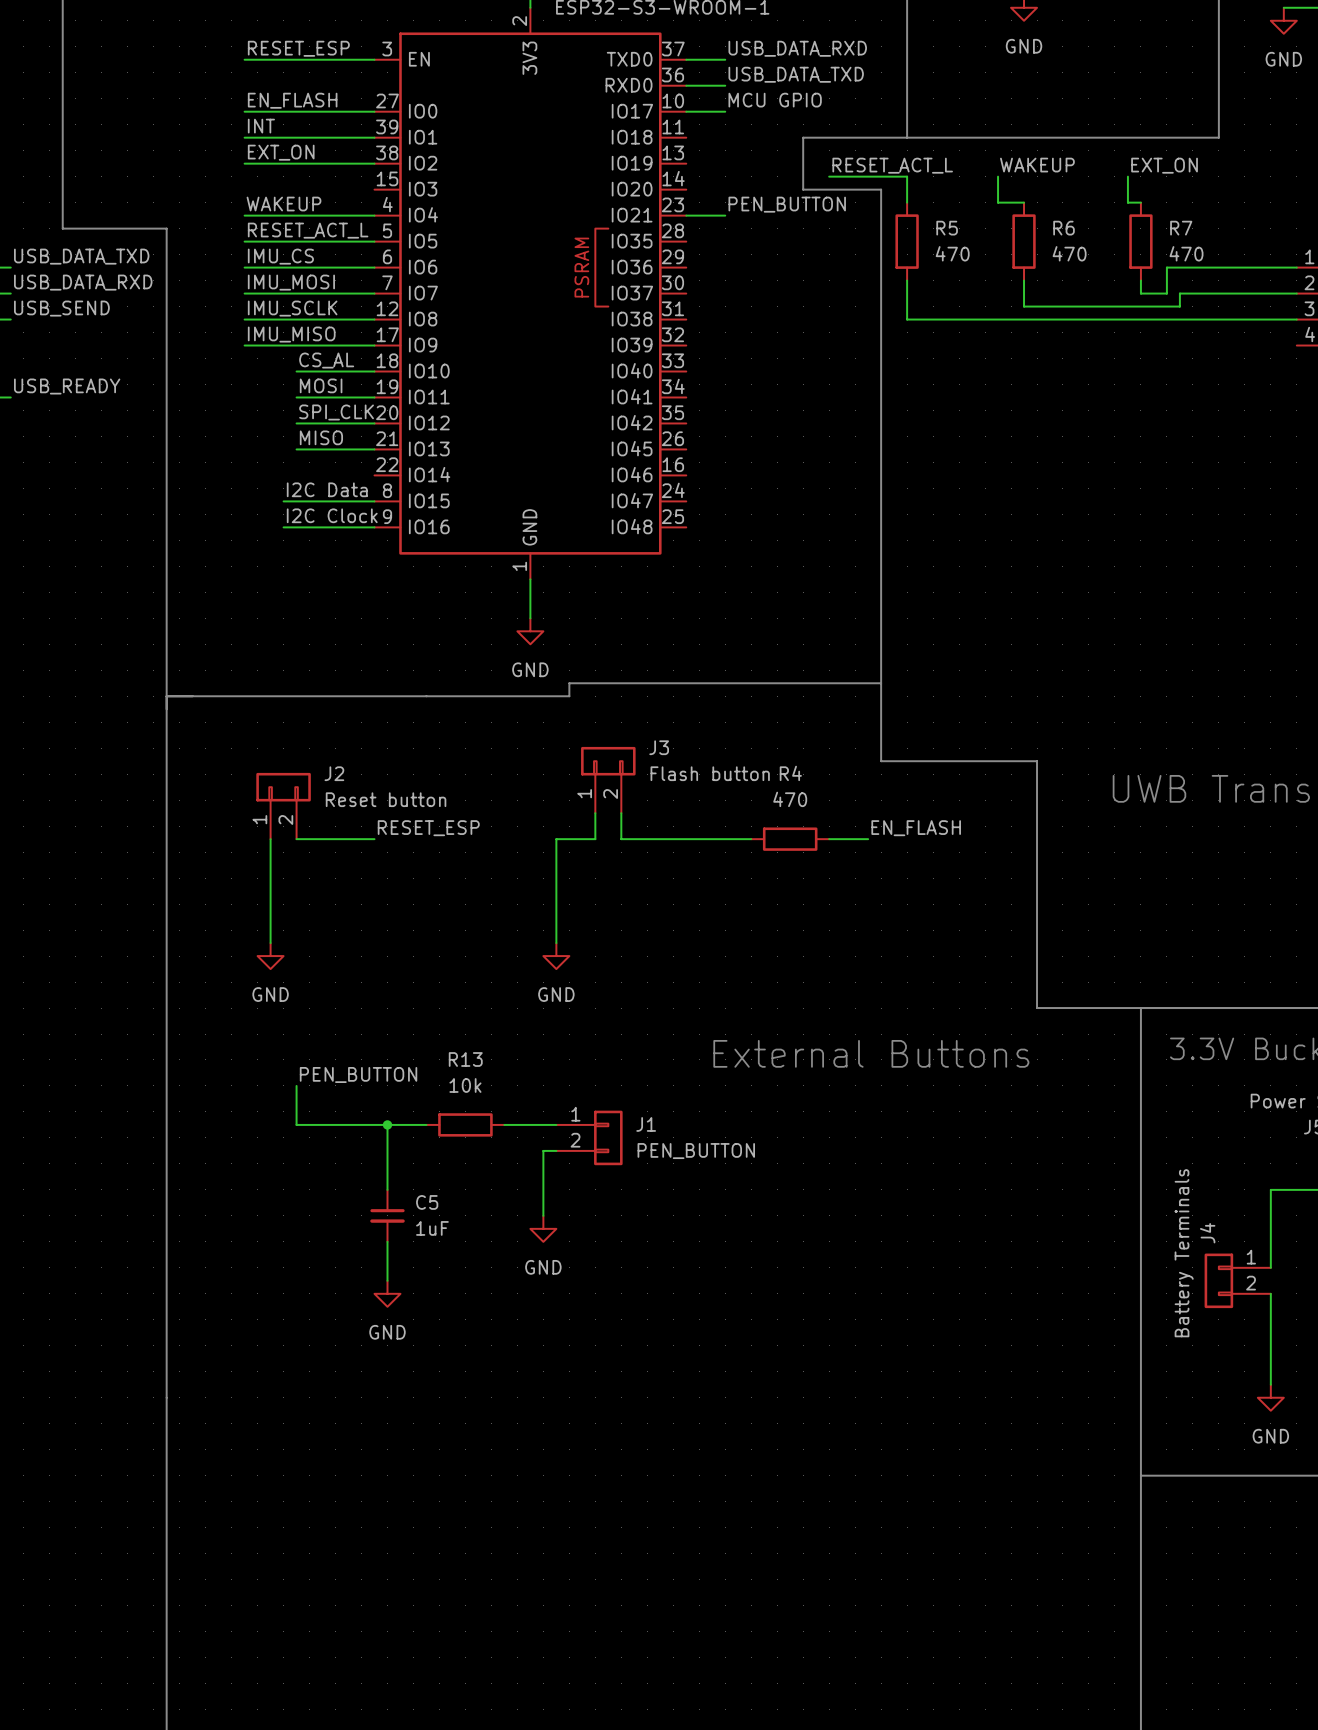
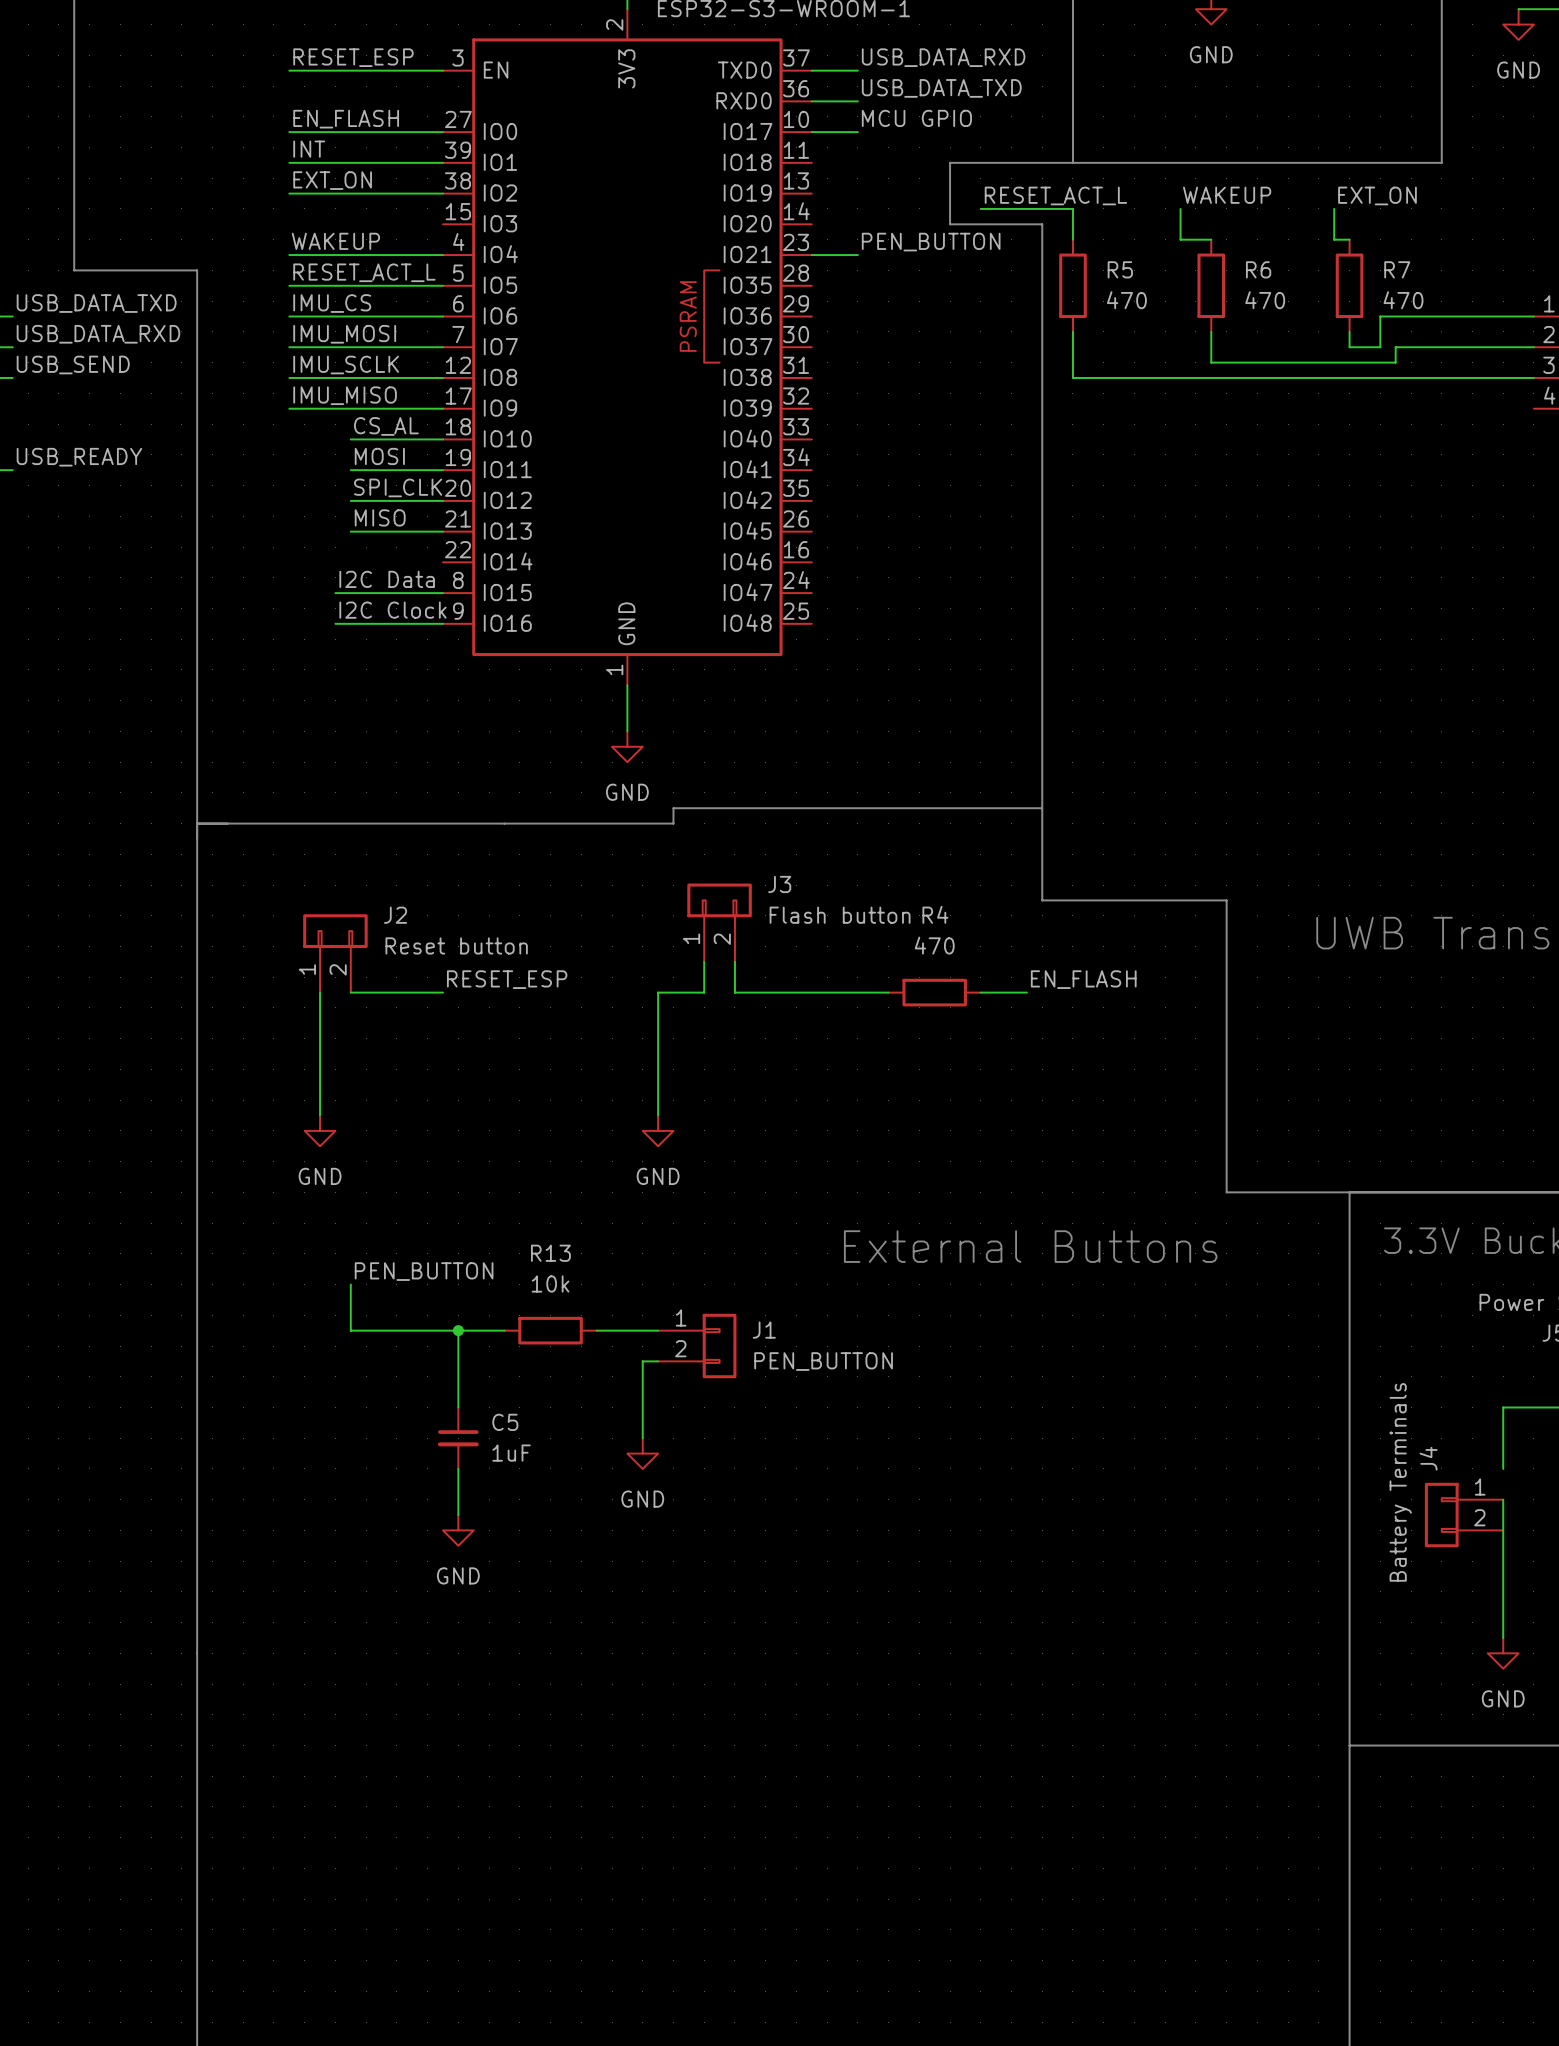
wire: (1270, 1241) (1270, 1267) -> (1503, 1530) (1503, 1499)

